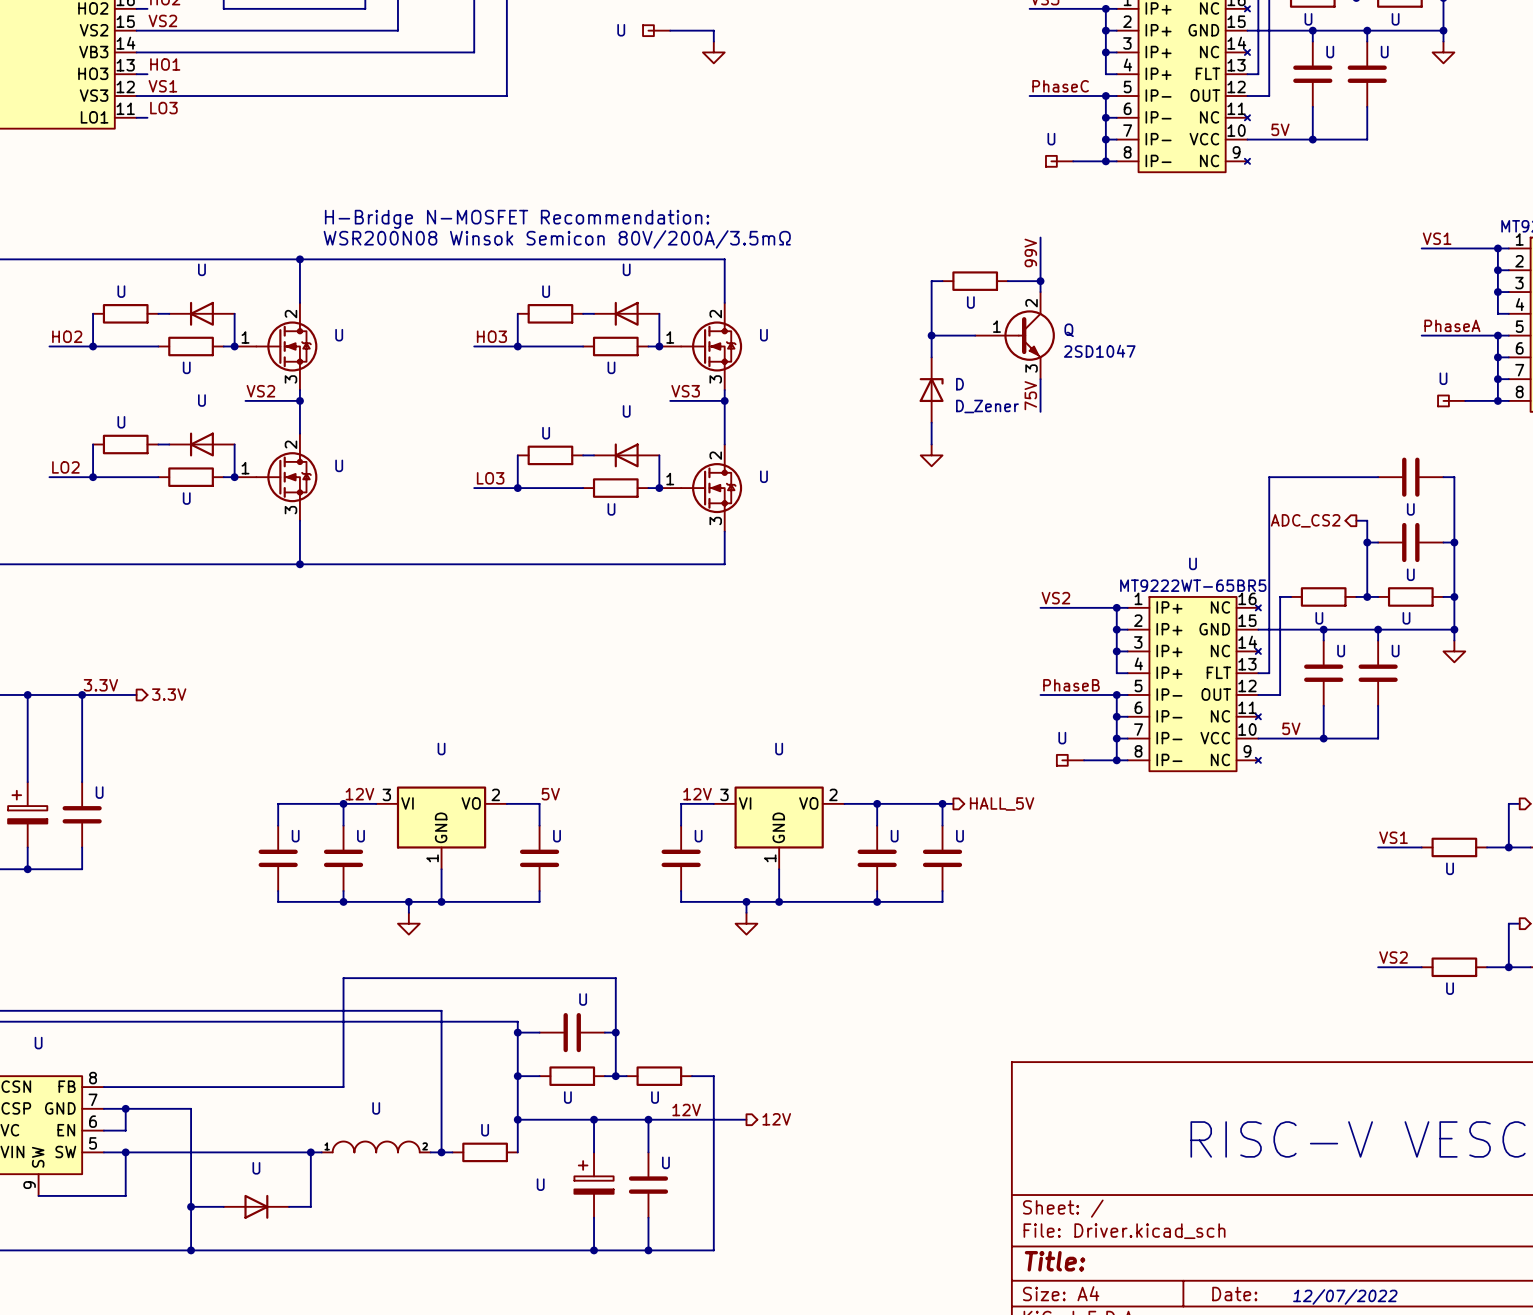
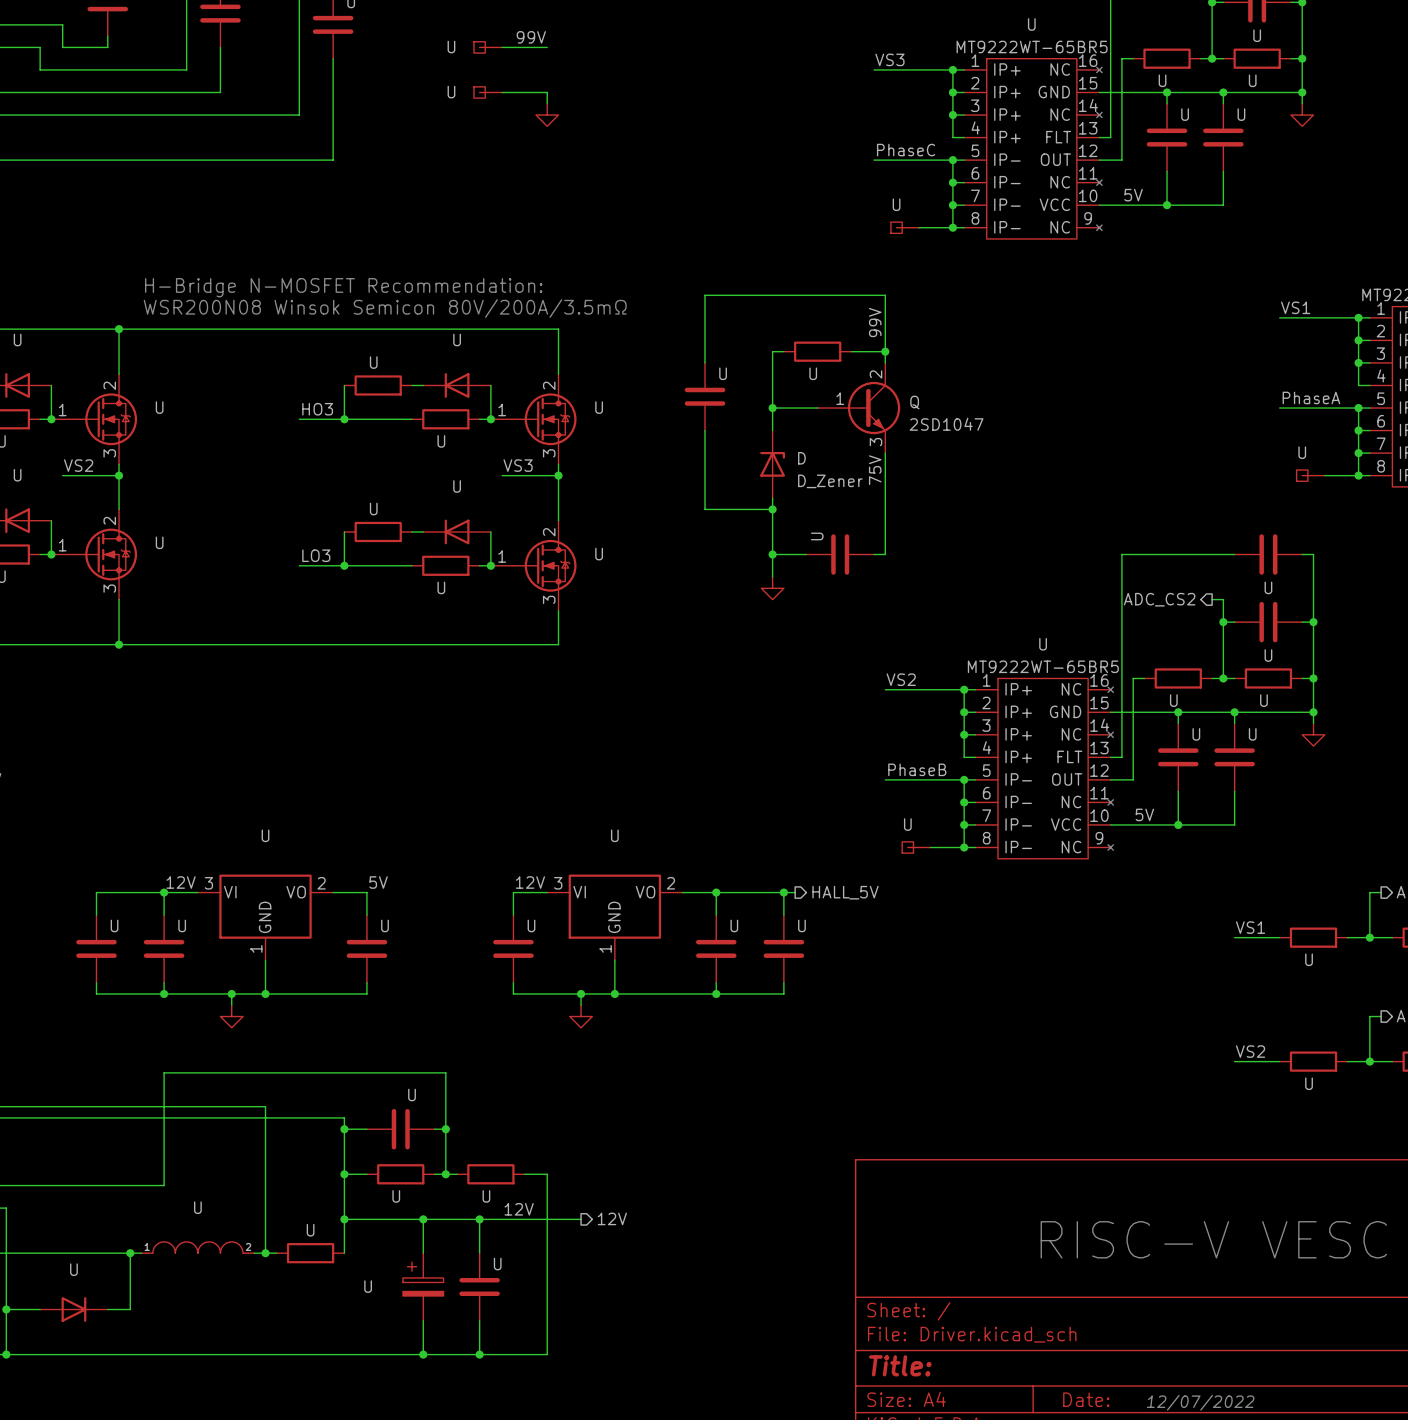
wire: none -> (885, 306) (885, 295) (705, 295) (705, 362)
U: none -> (705, 396)
wire: none -> (705, 430) (705, 509) (772, 509)
wire: none -> (885, 486) (885, 554) (874, 554)
junction: none -> (772, 509)
wire: none -> (772, 520) (772, 577)
power symbol position: (931, 455) -> (772, 588)
wire: none -> (772, 554) (806, 554)
junction: none -> (772, 554)
U: none -> (840, 554)

